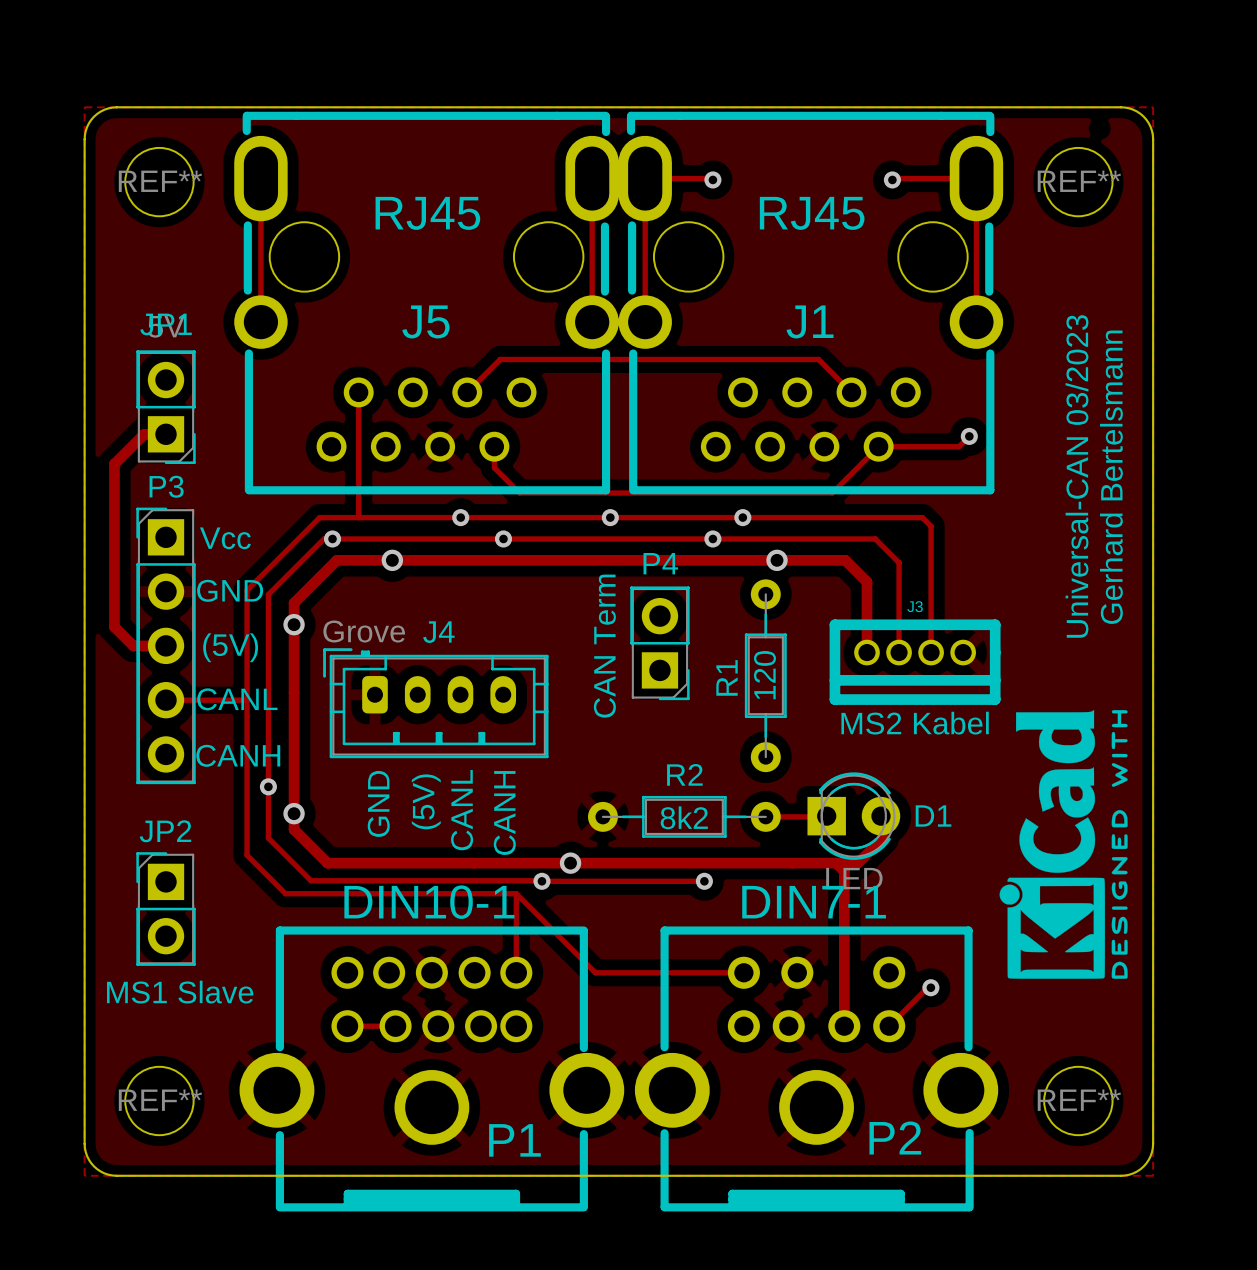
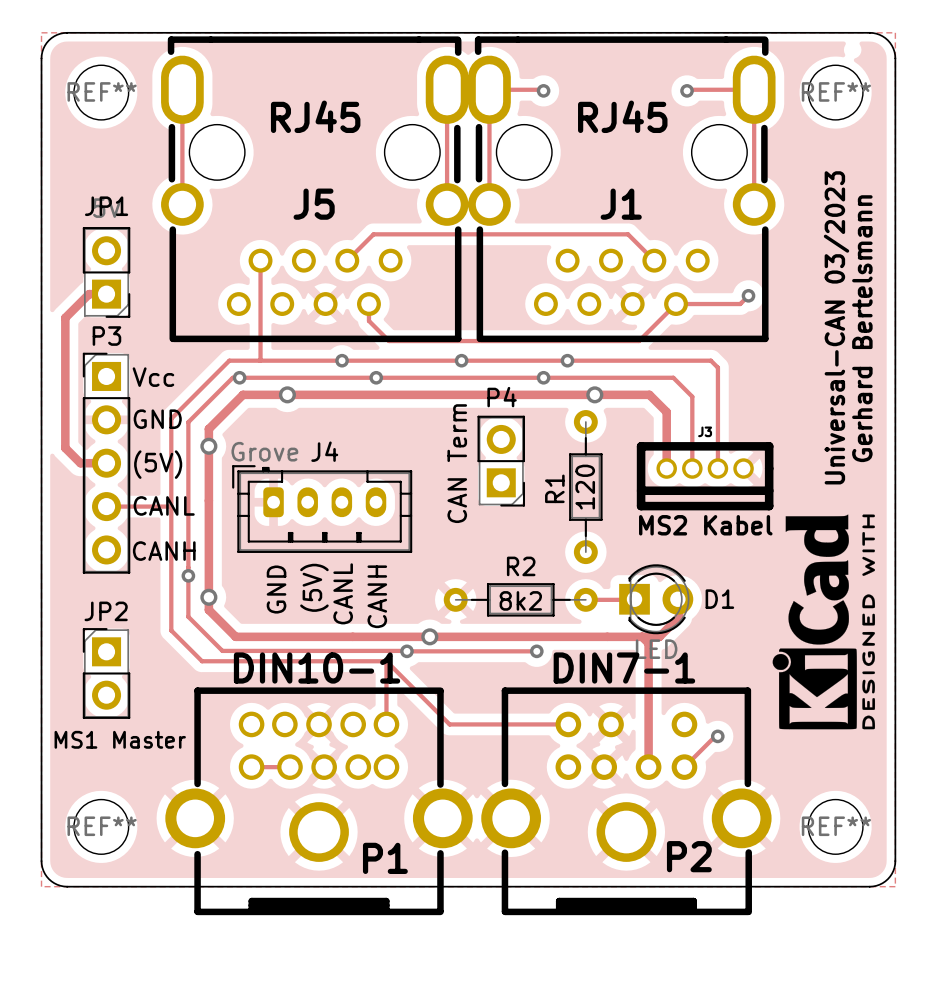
JP2 value: MS1 Slave (180, 992) -> MS1 Master (120, 739)

